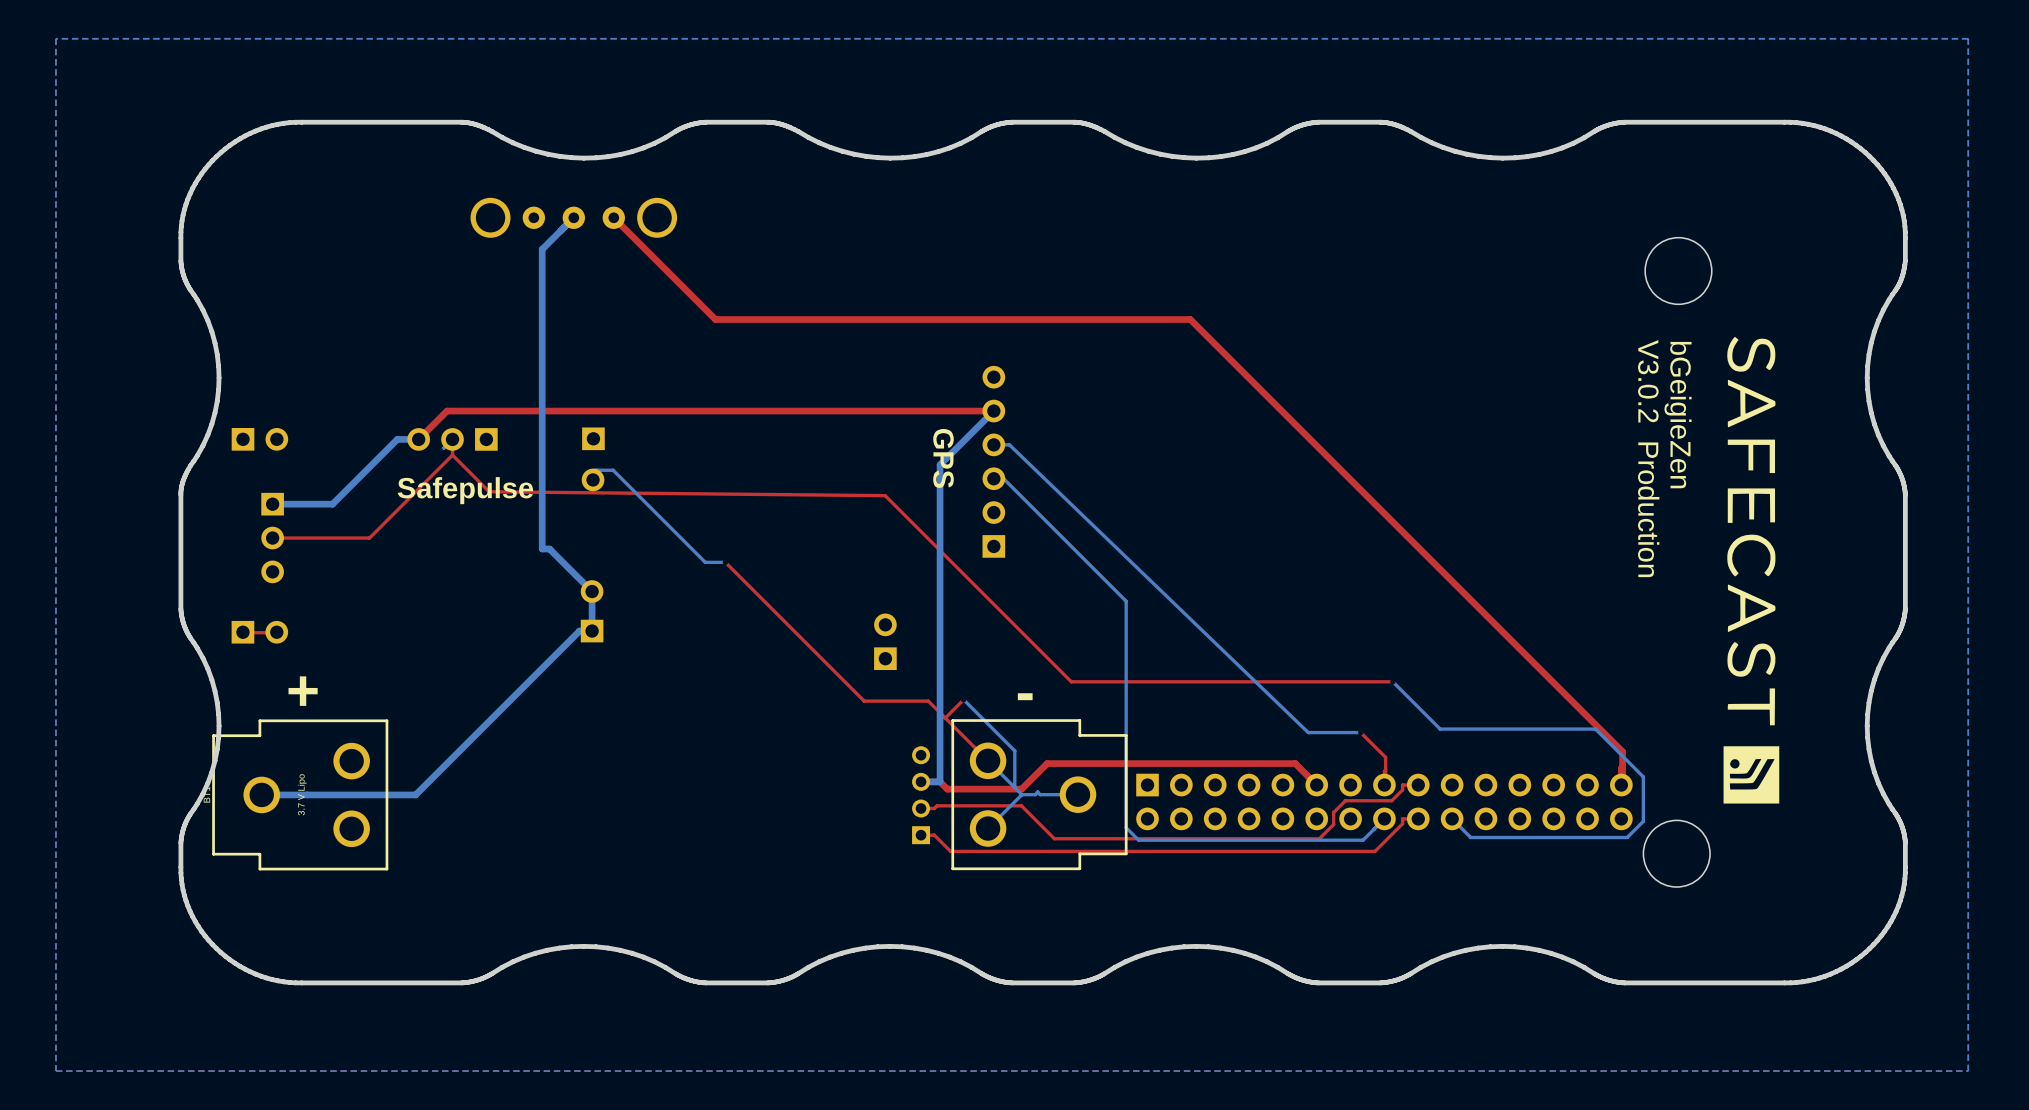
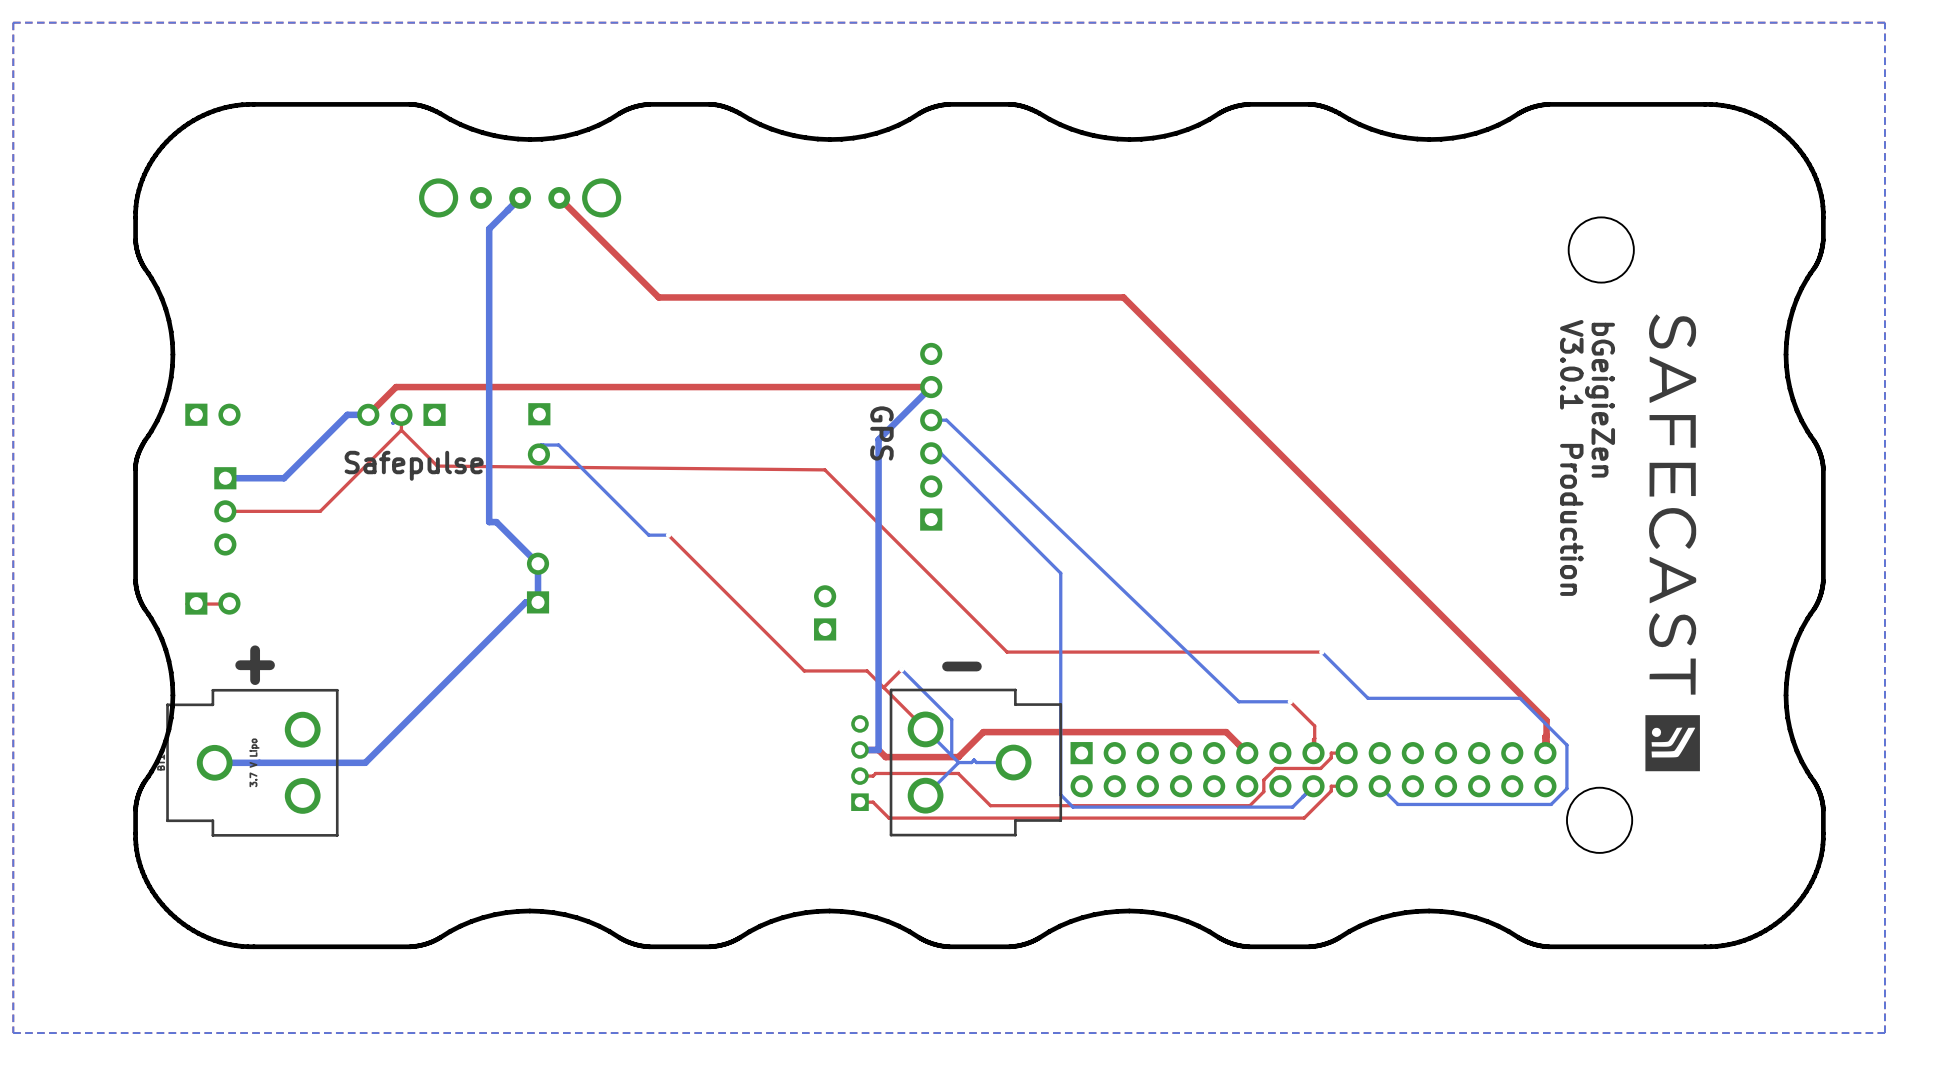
text: V3.0.2 Production (1648, 458) -> V3.0.1 Production (1571, 457)

